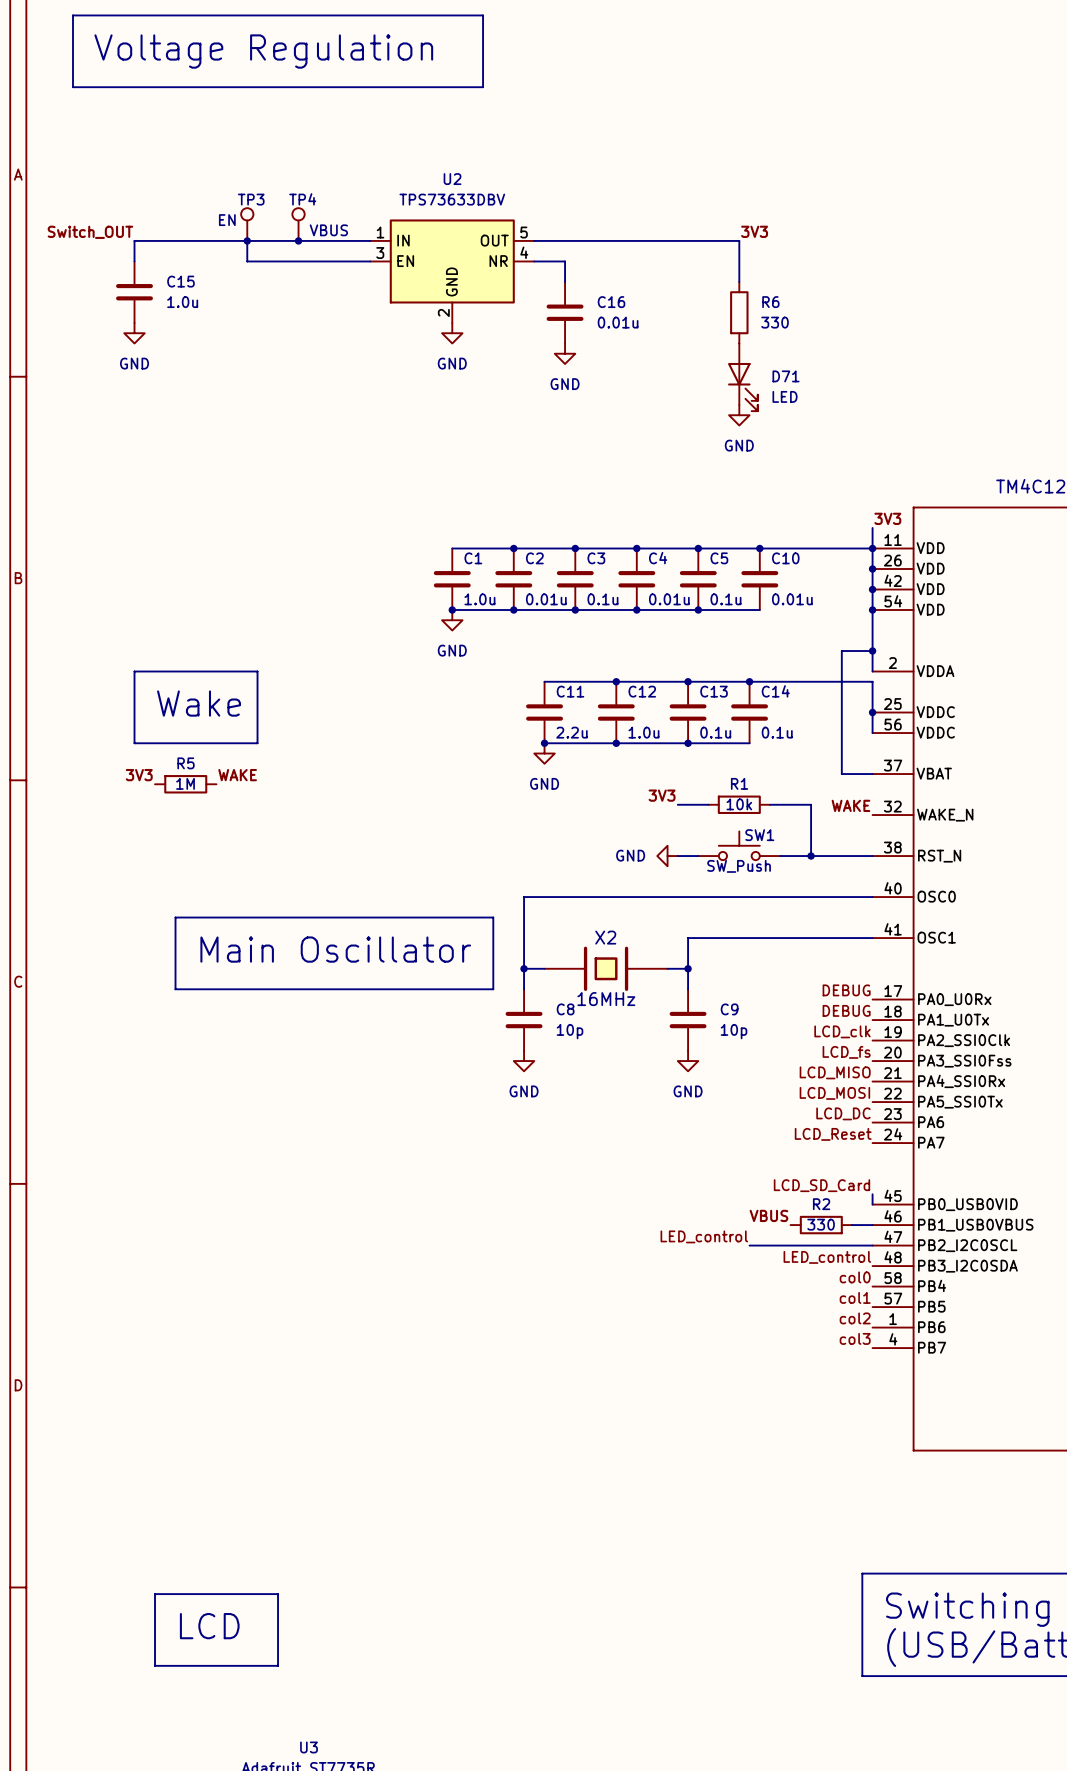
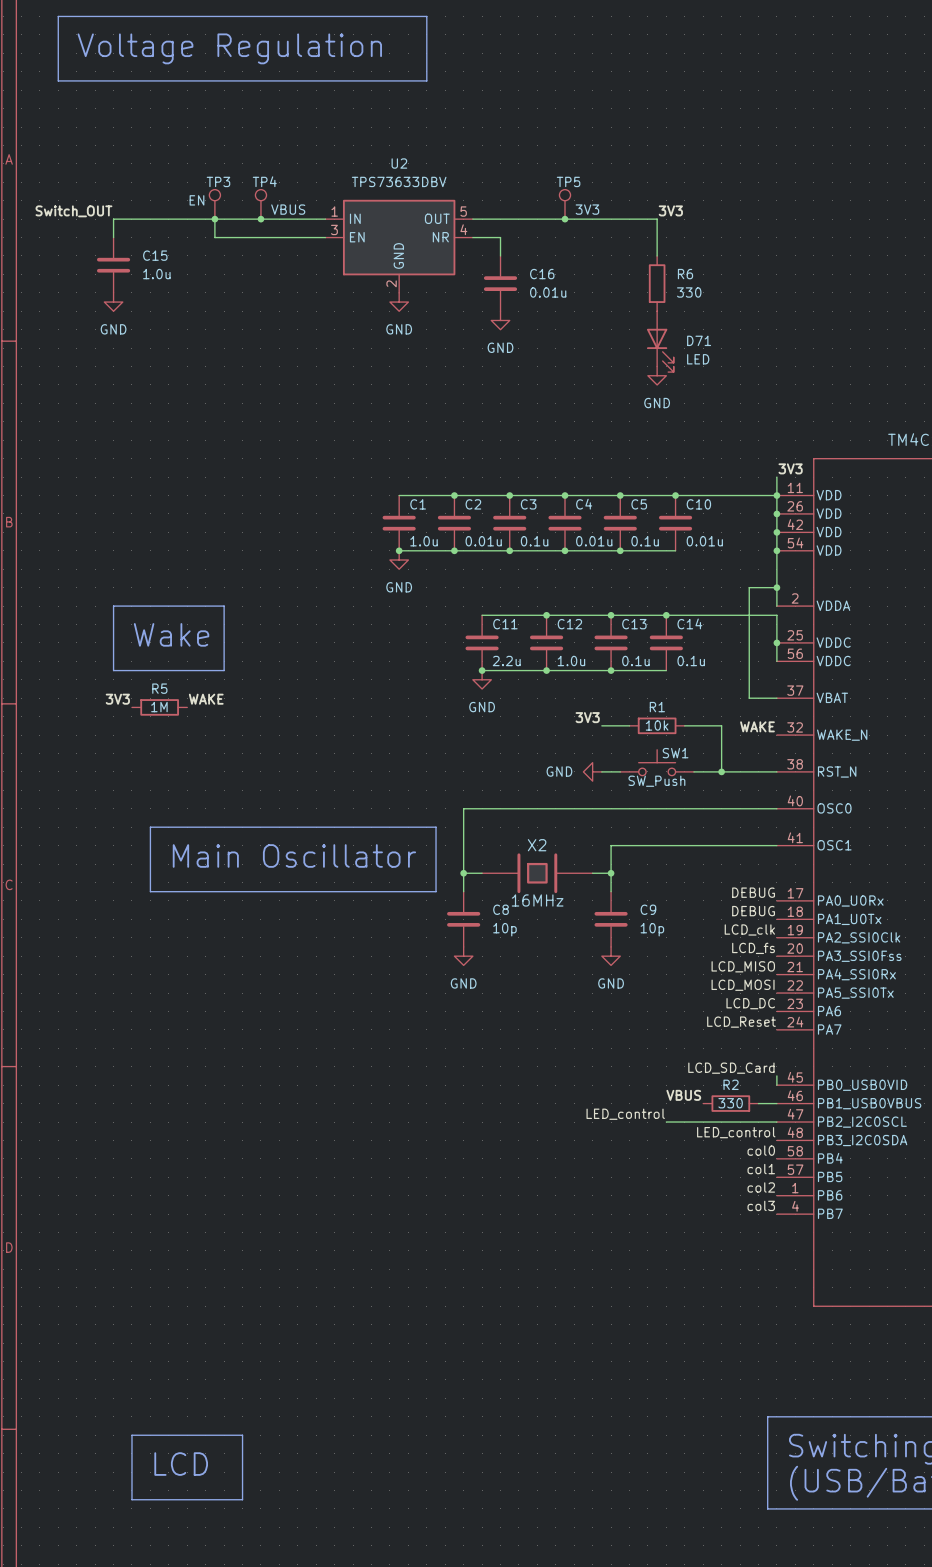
TP5: none -> 3V3 (565, 204)
junction: none -> (565, 219)

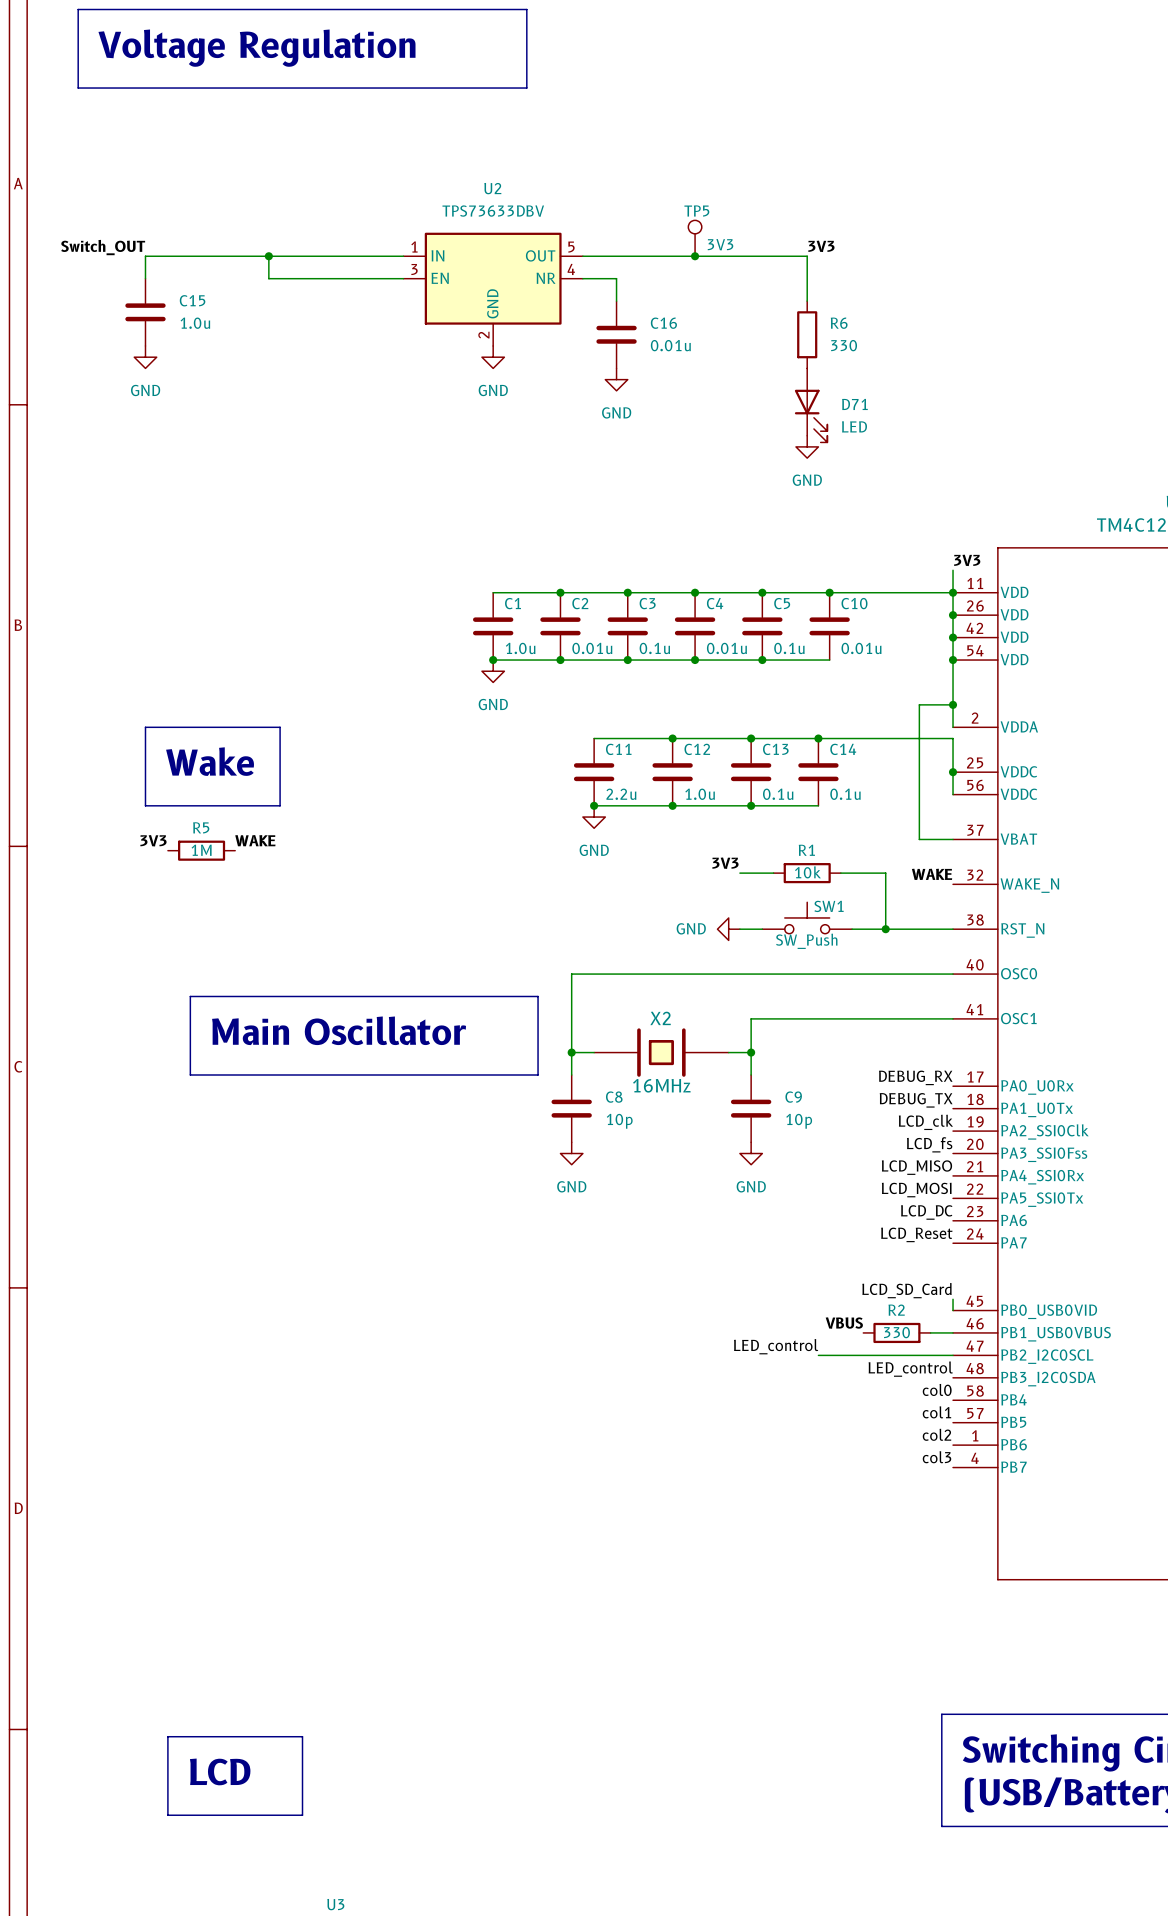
TP3: EN (214, 204) -> none
TP4: VBUS (260, 204) -> none
junction: (260, 219) -> none
label: DEBUG (753, 892) -> DEBUG_RX (915, 1077)
label: DEBUG (753, 911) -> DEBUG_TX (916, 1100)

